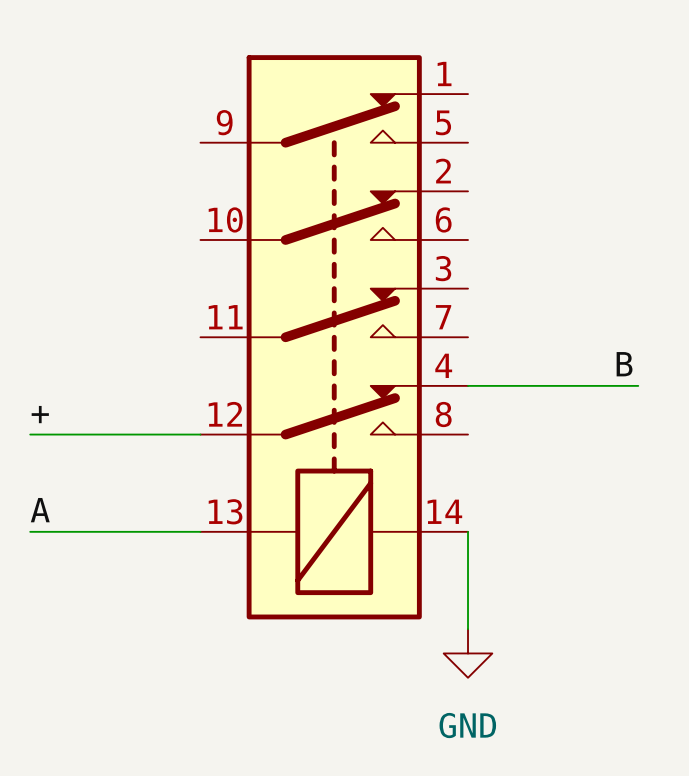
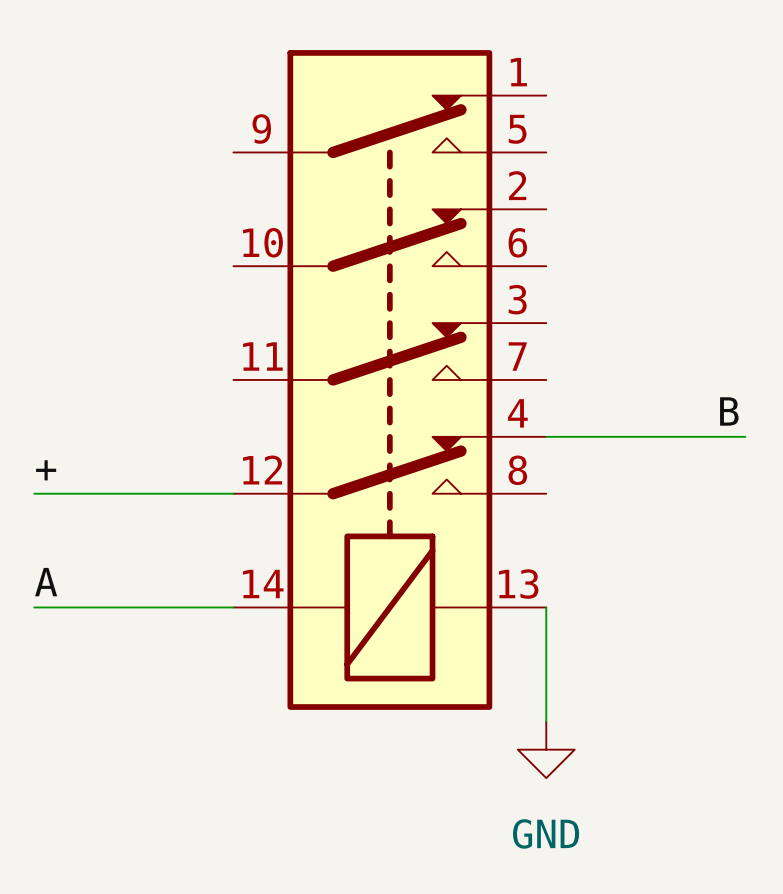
part pin number: 13 (225, 511) -> 14 (263, 584)
part pin number: 14 (444, 511) -> 13 (518, 584)

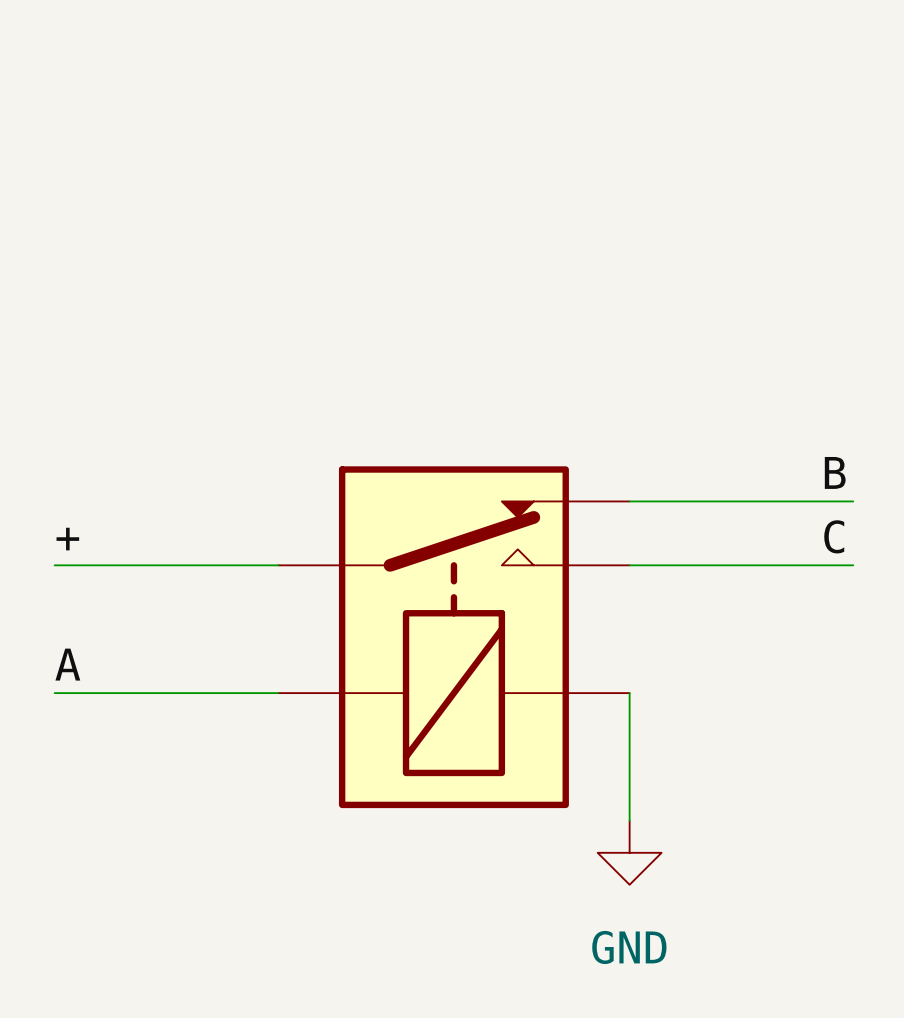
part: (389, 379) -> none
label: none -> C (834, 536)
wire: none -> (629, 565) (853, 565)
part: none -> (453, 637)

